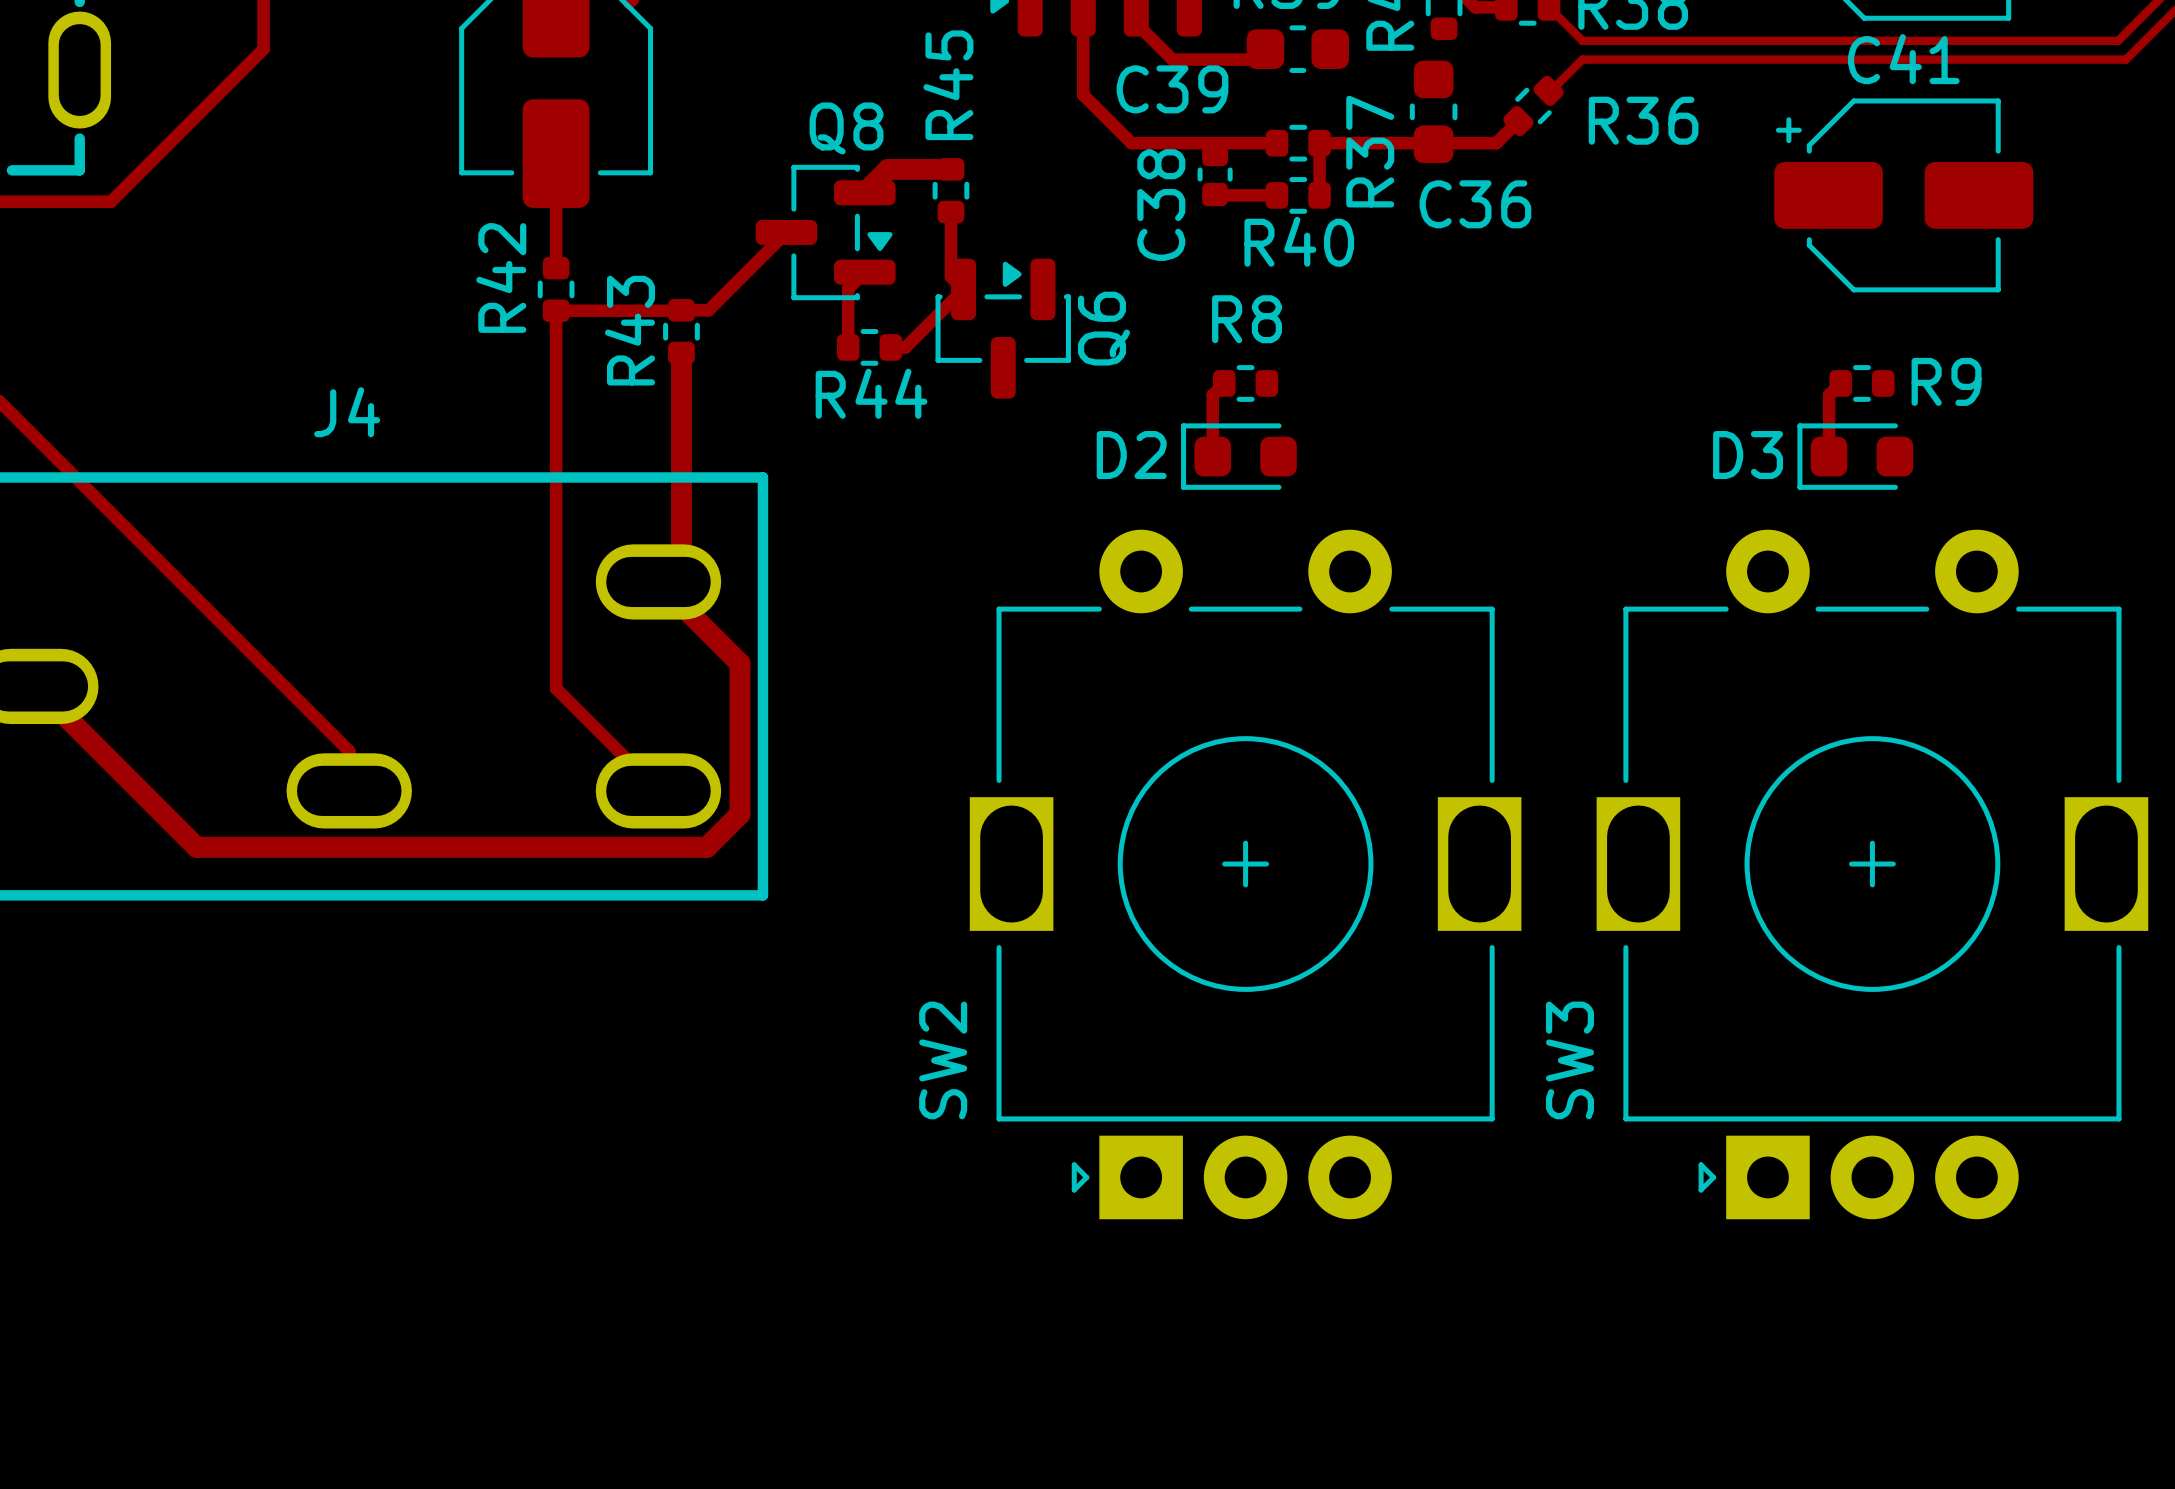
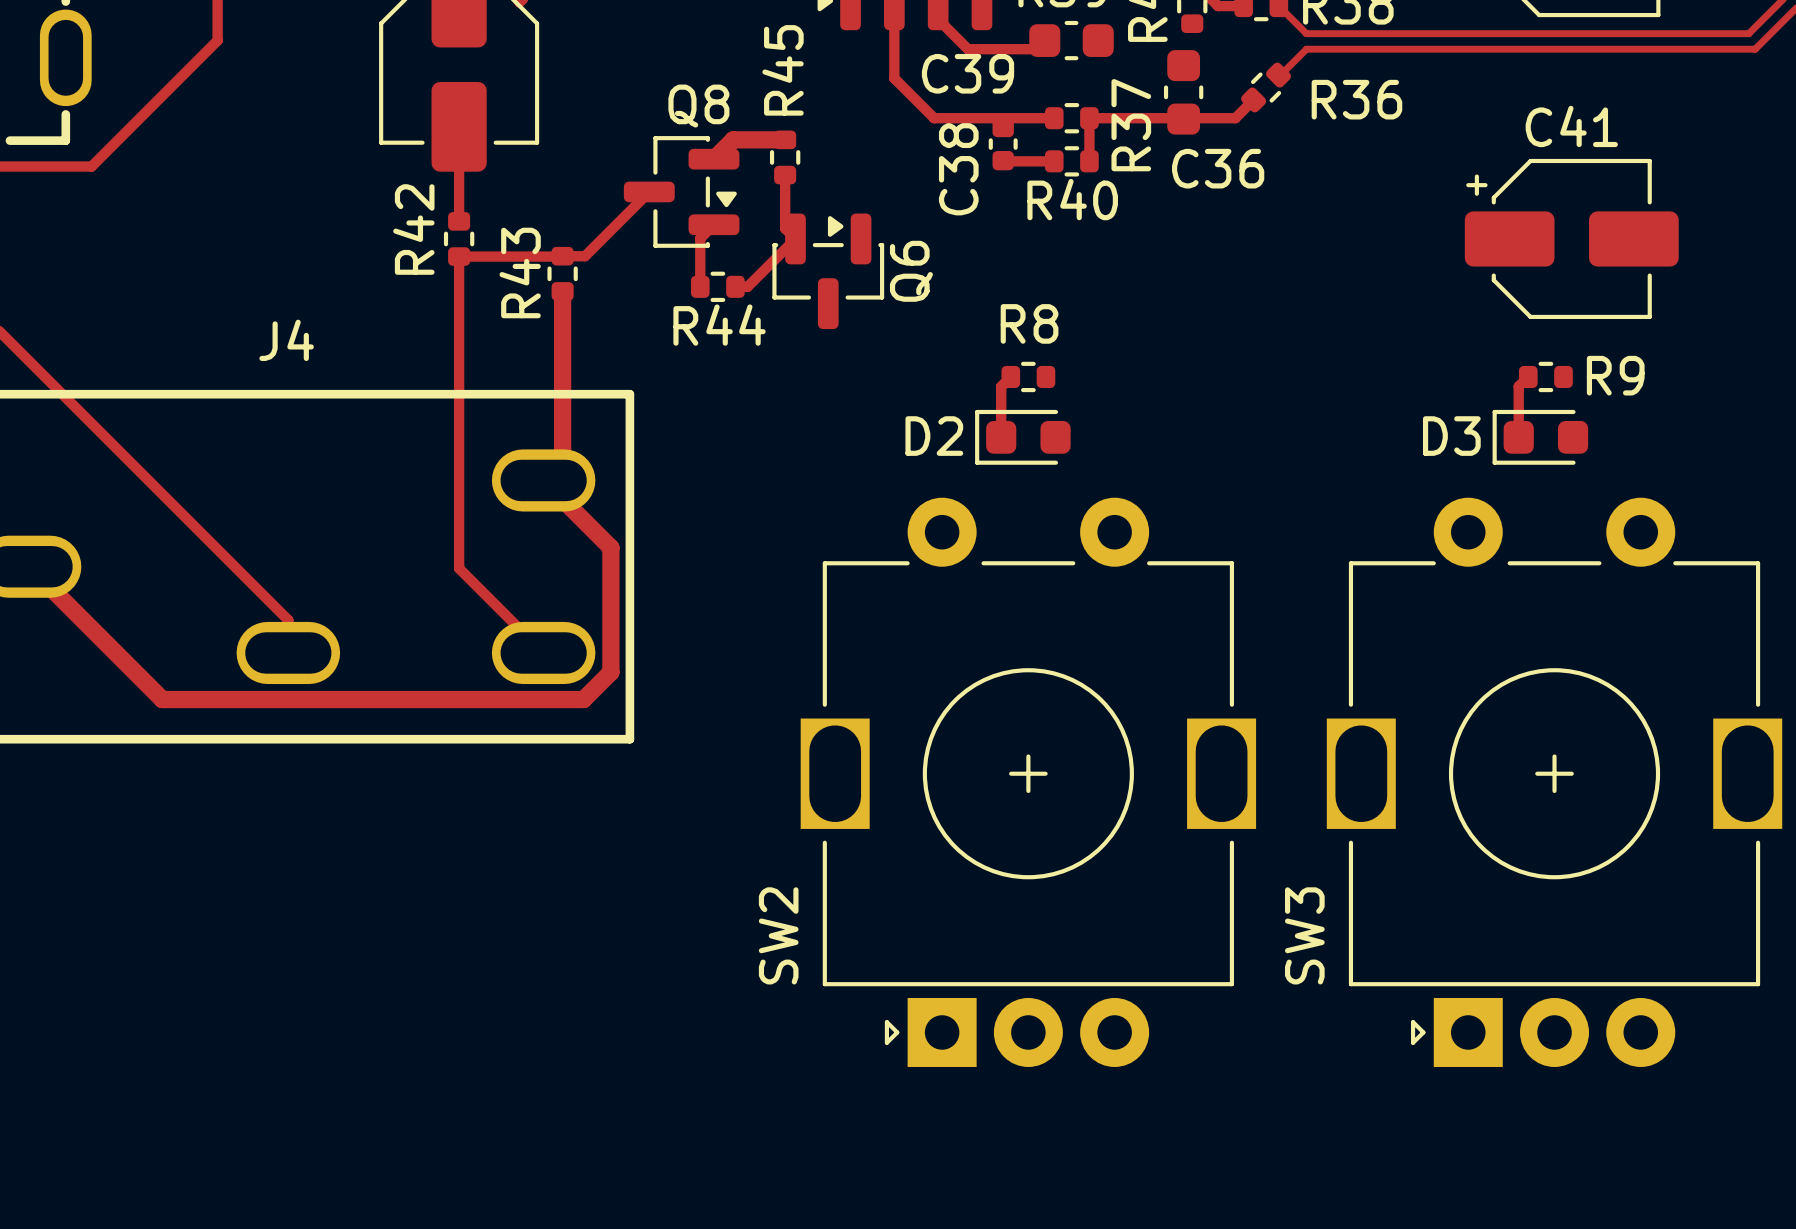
C41 position: (1903, 195) -> (1571, 238)
track: (1224, 383) (1212, 395) (1212, 456) -> (1010, 376) (1001, 386) (1001, 437)
R8 position: (1245, 383) -> (1028, 376)
track: (1840, 383) (1829, 395) (1829, 456) -> (1528, 376) (1518, 386) (1518, 437)
R9 position: (1861, 383) -> (1545, 376)
D2 position: (1238, 456) -> (1022, 437)
D3 position: (1855, 456) -> (1540, 437)
SW2 position: (1245, 874) -> (1028, 782)
SW3 position: (1872, 874) -> (1554, 782)

